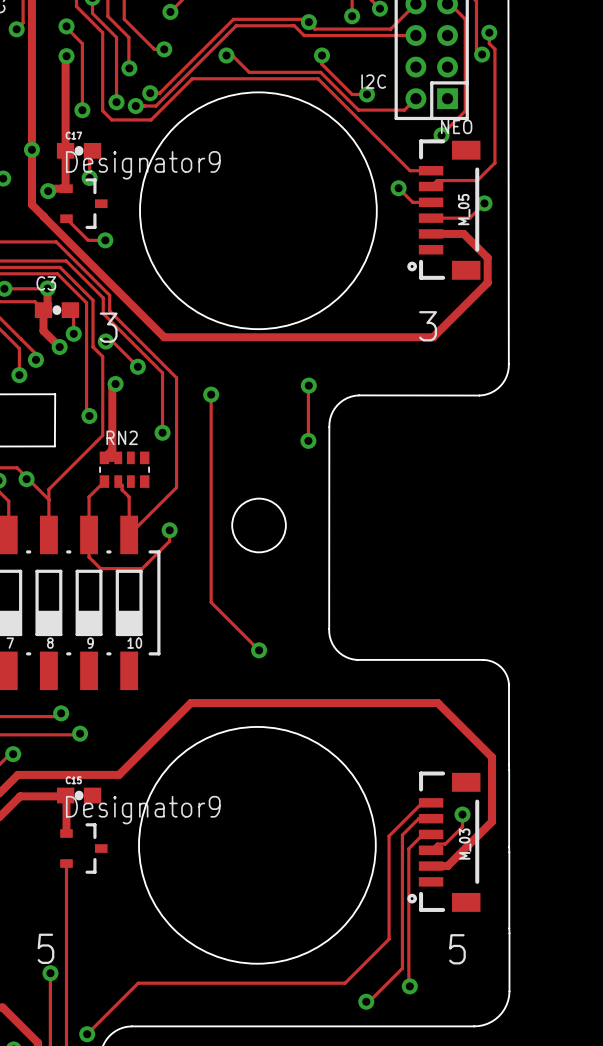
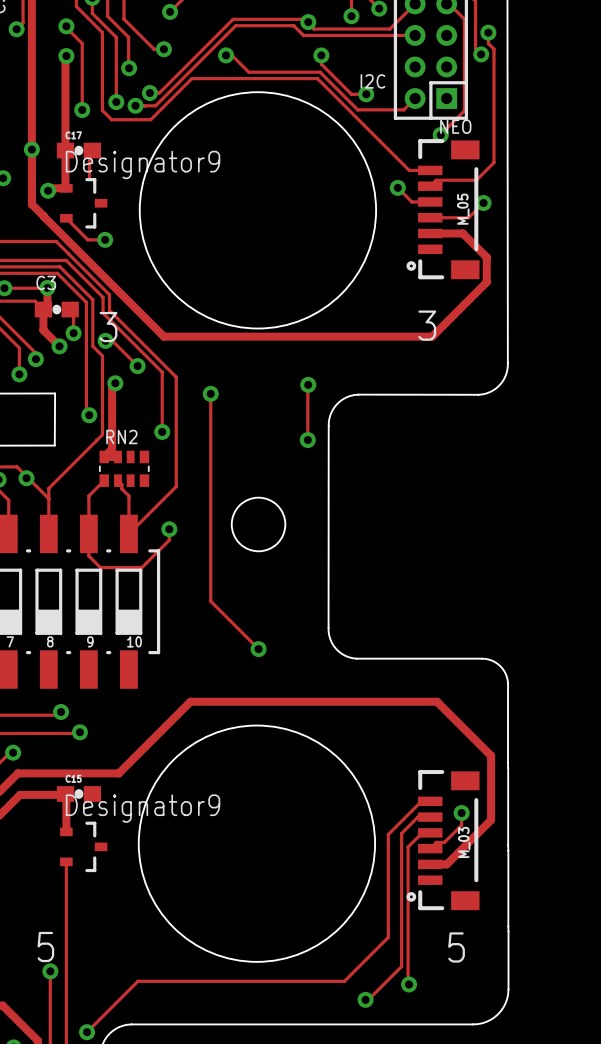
via: (89, 178) -> none

